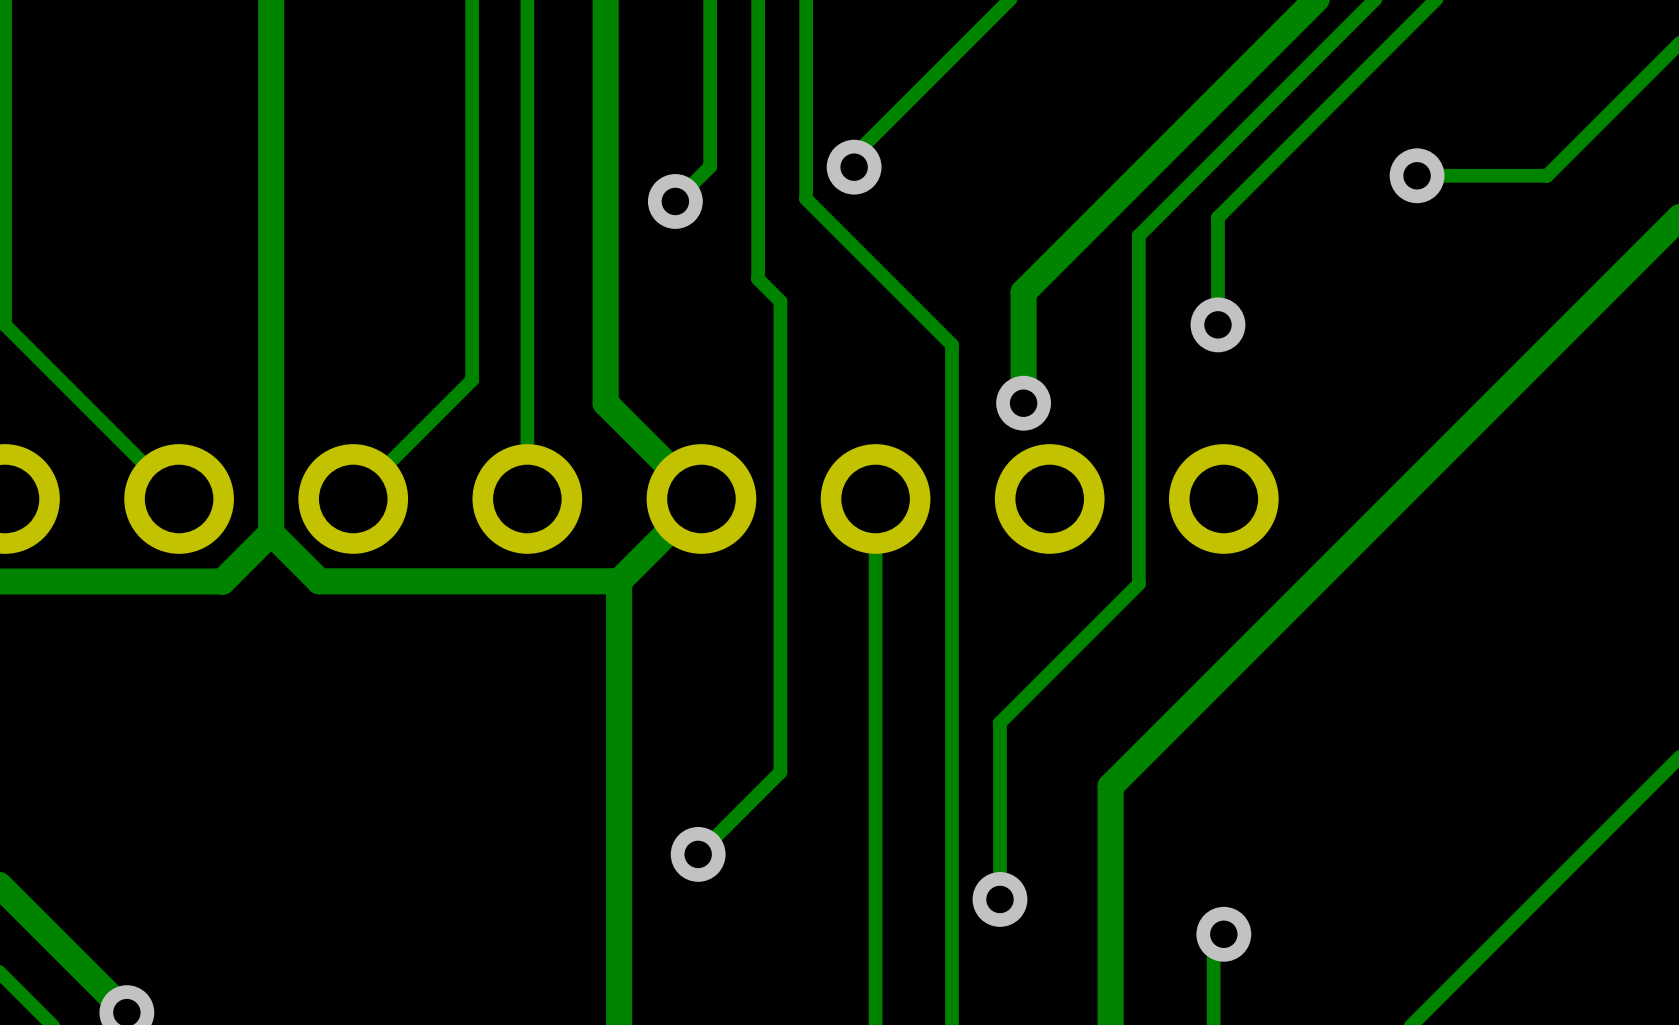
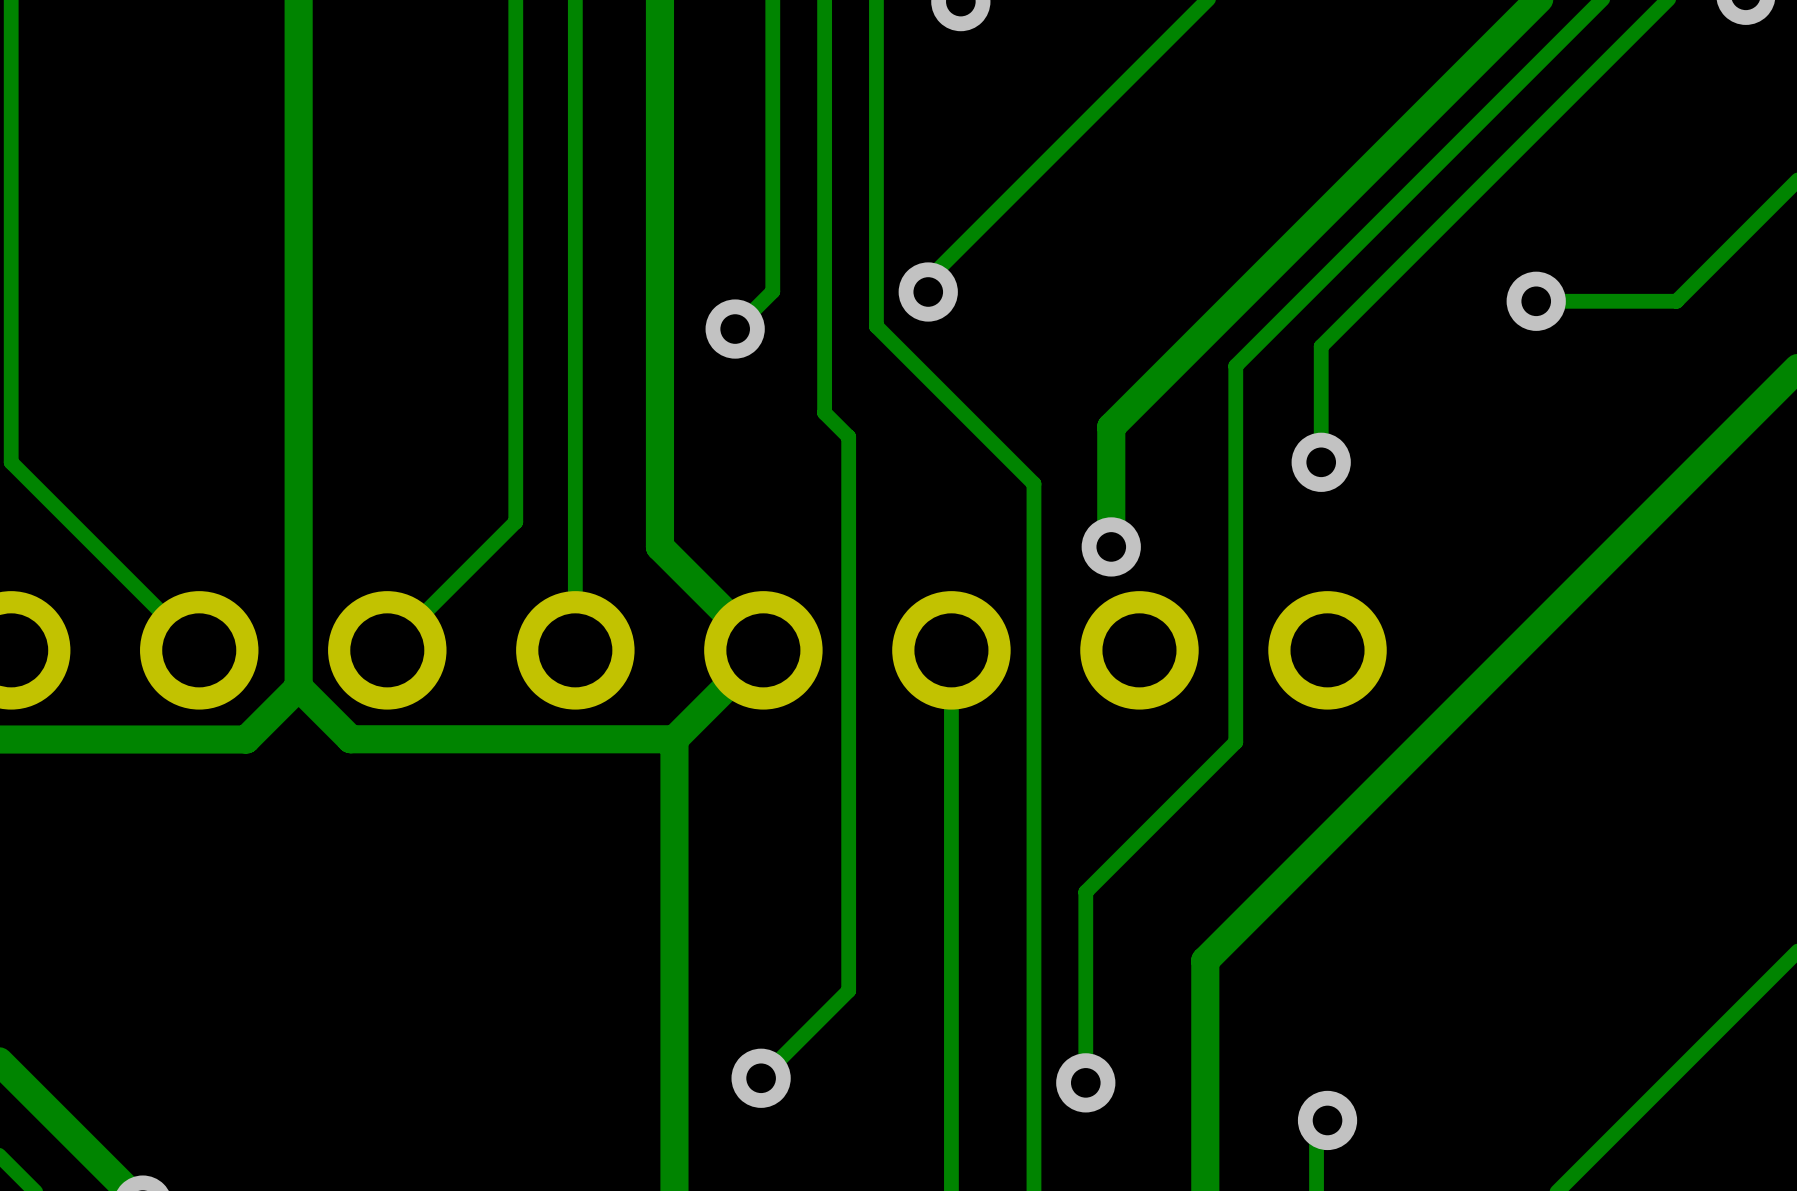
track: (780, 772) (698, 854) -> (848, 945) (848, 990) (761, 1078)
via position: (698, 854) -> (761, 1078)

